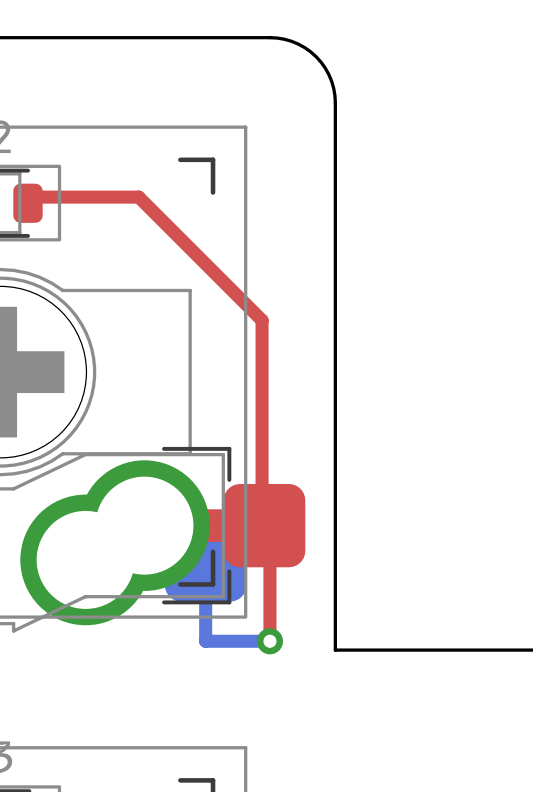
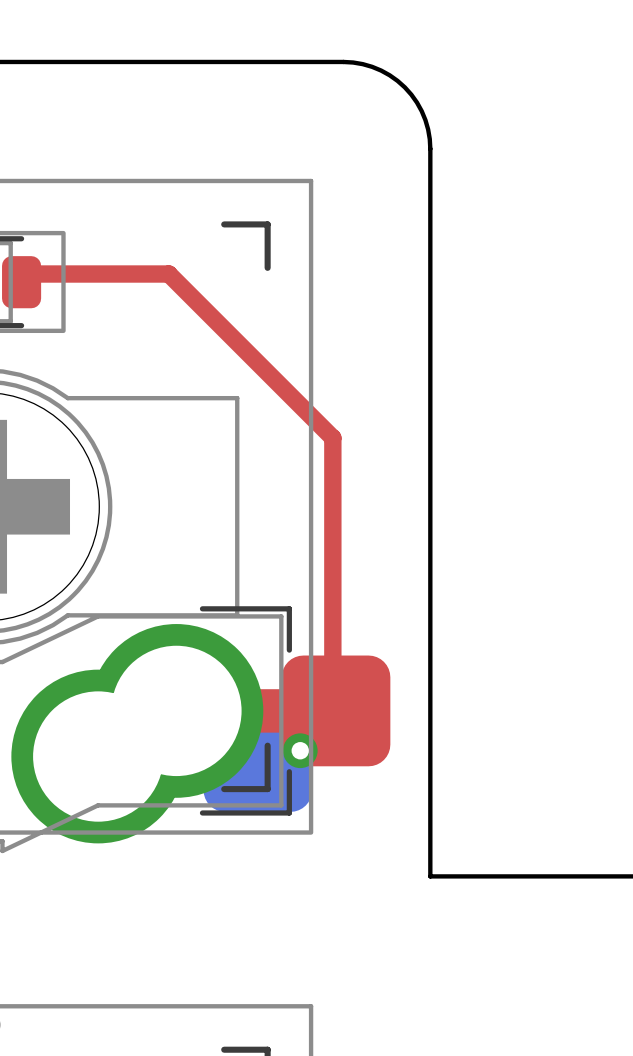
top track: (264, 525) (269, 531) (269, 641) -> none
bottom track: (205, 559) (205, 641) (269, 641) -> none
via position: (269, 641) -> (300, 750)

